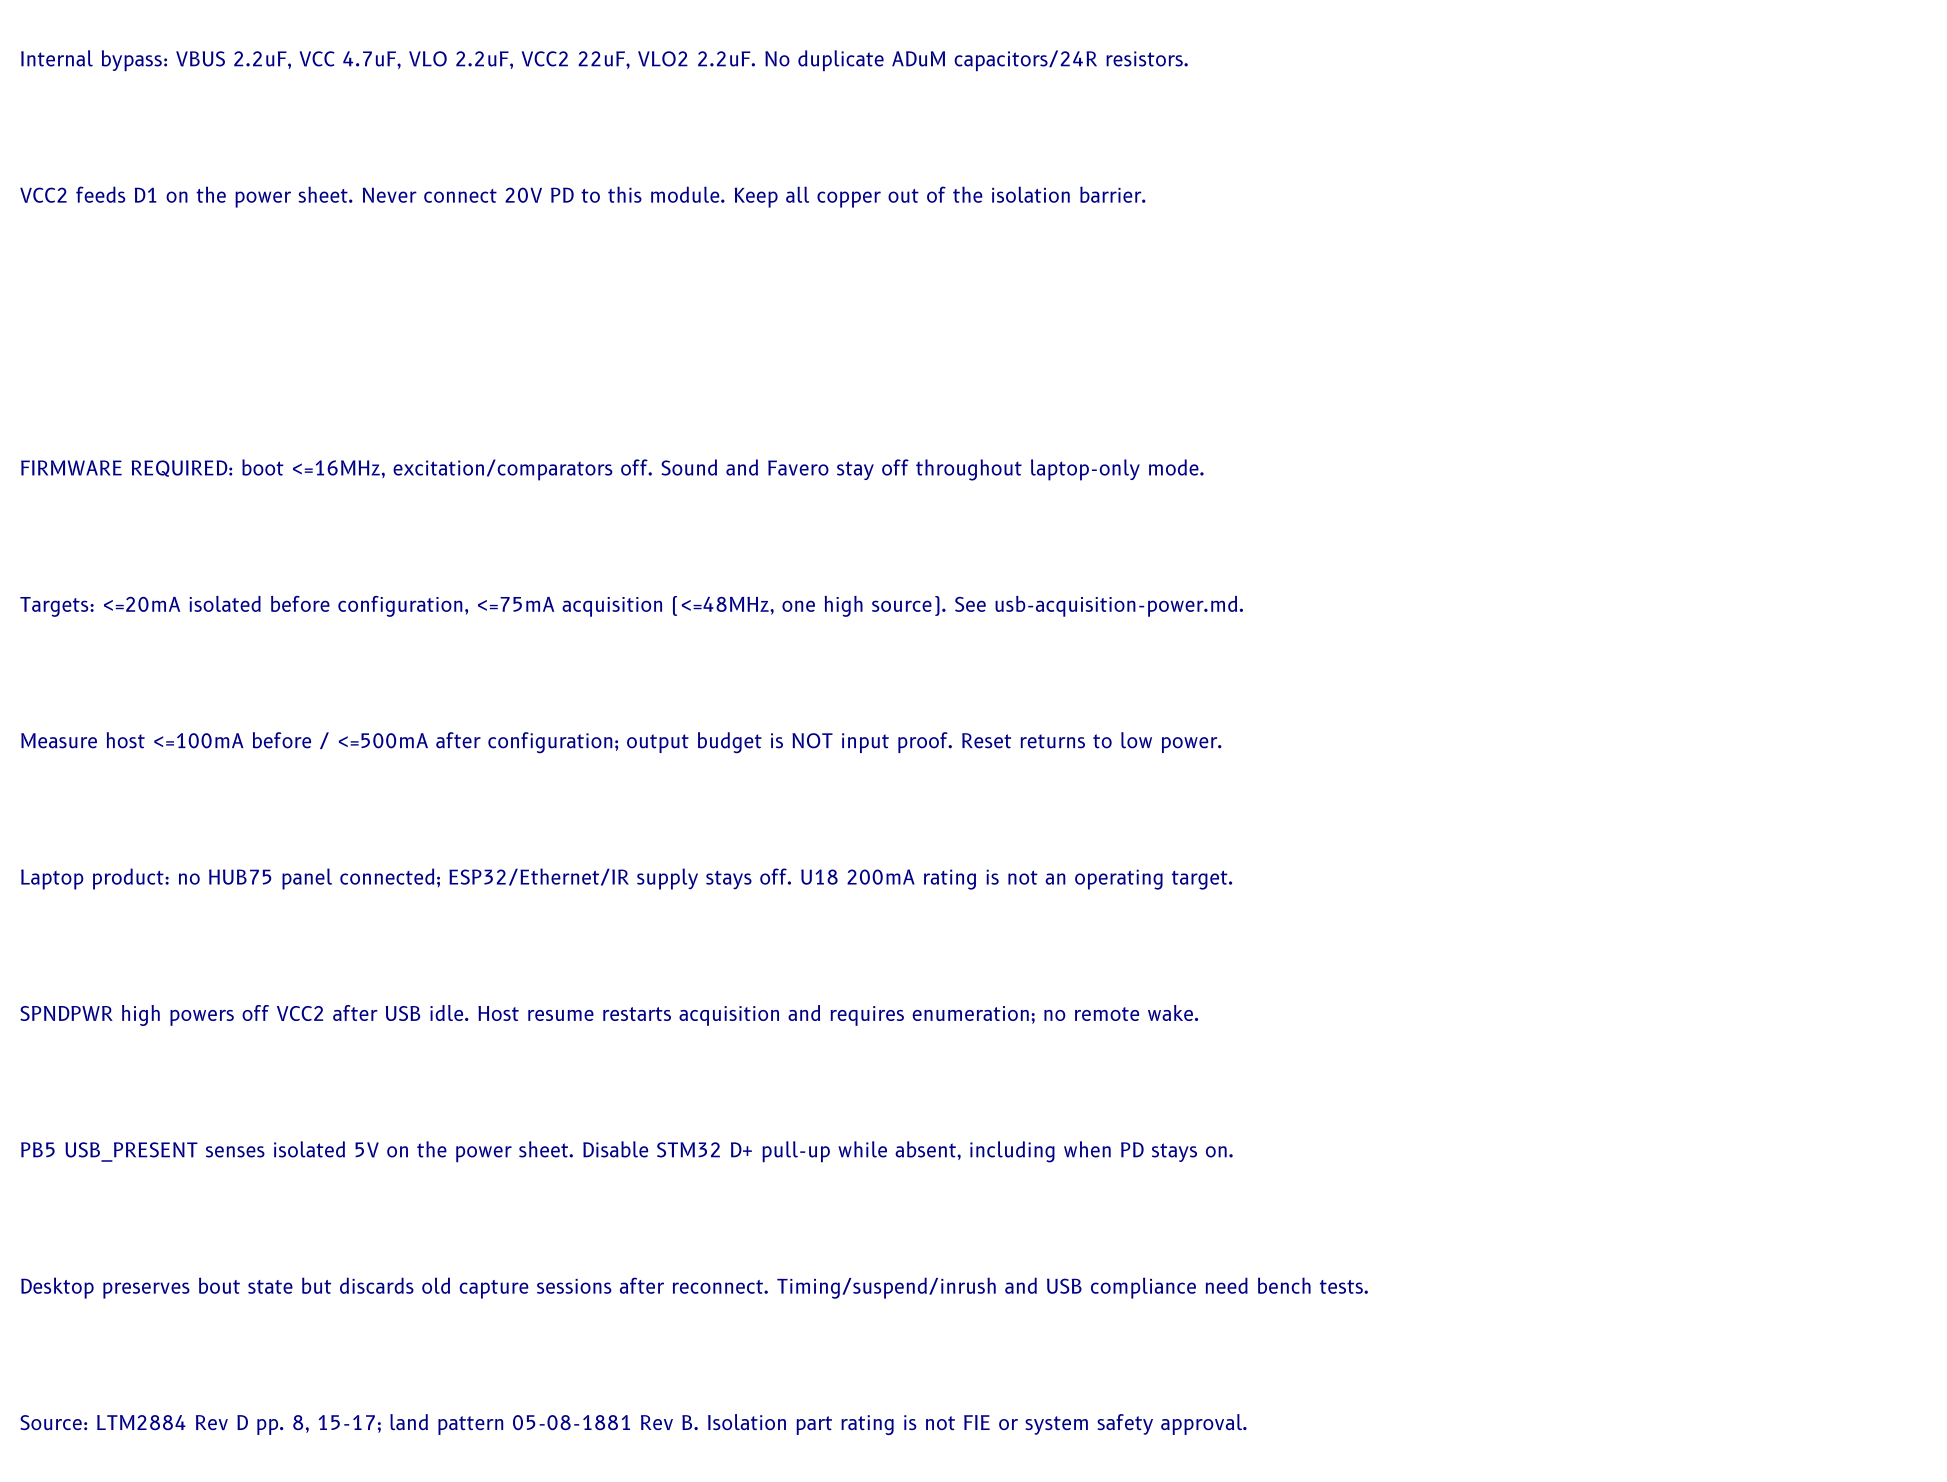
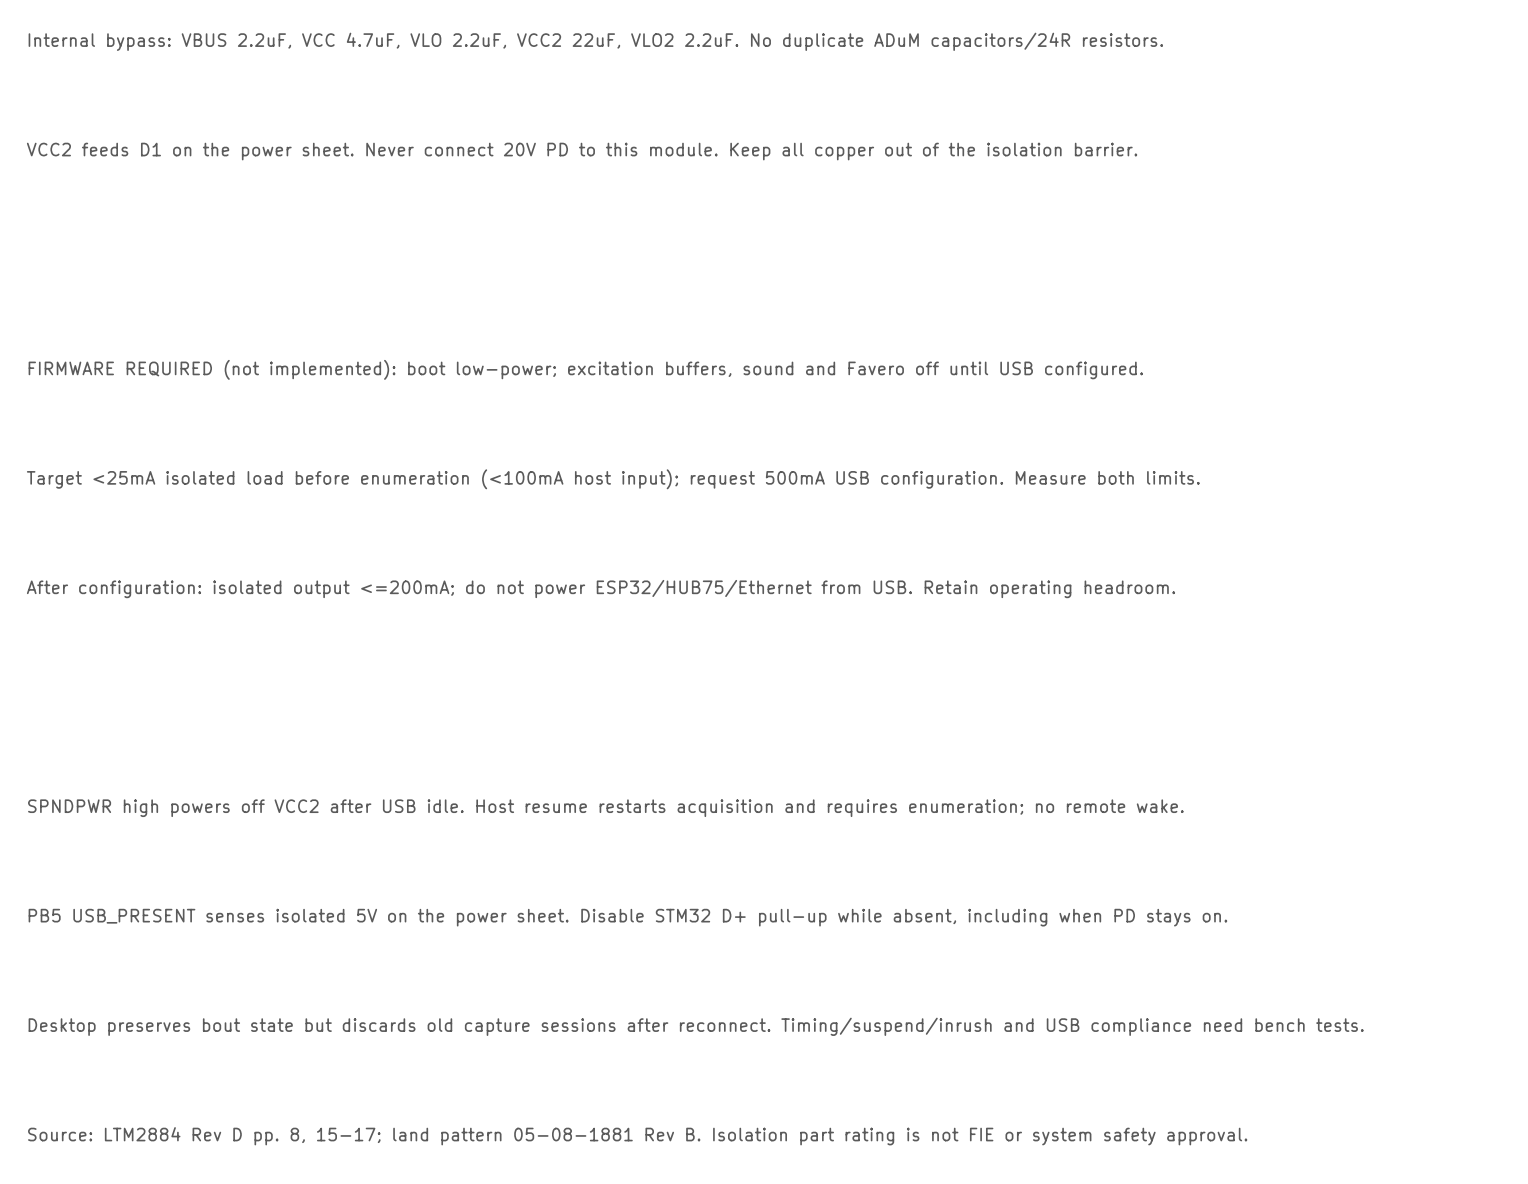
text: FIRMWARE REQUIRED: boot <=16MHz, excitation/comparators off. Sound and Favero stay off throughout laptop-only mode. (612, 469) -> FIRMWARE REQUIRED (not implemented): boot low-power; excitation buffers, sound and Favero off until USB configured. (585, 369)
text: Targets: <=20mA isolated before configuration, <=75mA acquisition (<=48MHz, one high source). See usb-acquisition-power.md. (631, 606) -> Target <25mA isolated load before enumeration (<100mA host input); request 500mA USB configuration. Measure both limits. (613, 479)
text: Measure host <=100mA before / <=500mA after configuration; output budget is NOT input proof. Reset returns to low power. (621, 742) -> After configuration: isolated output <=200mA; do not power ESP32/HUB75/Ethernet from USB. Retain operating headroom. (601, 589)
text: Laptop product: no HUB75 panel connected; ESP32/Ethernet/IR supply stays off. U18 200mA rating is not an operating target. (626, 879) -> none

